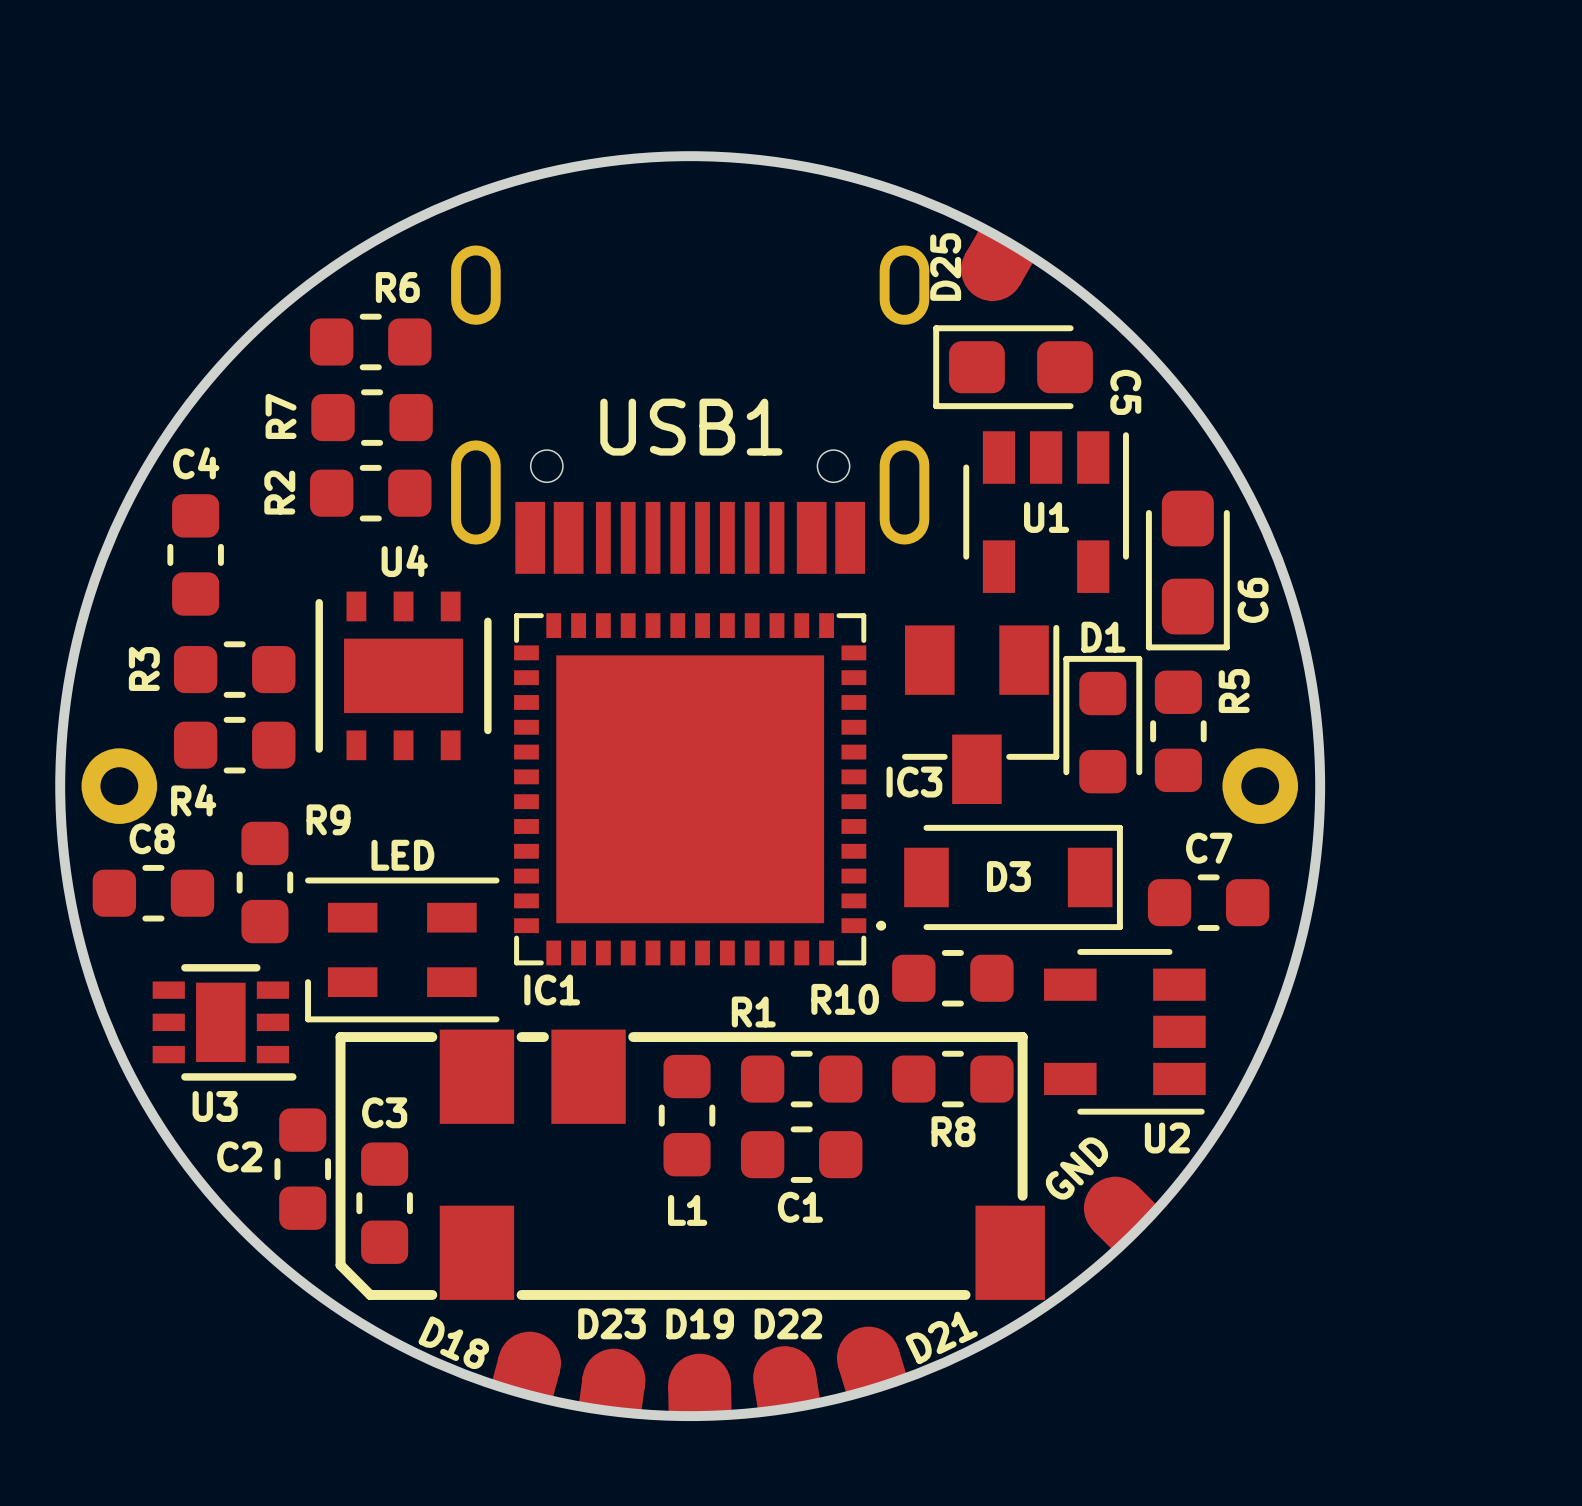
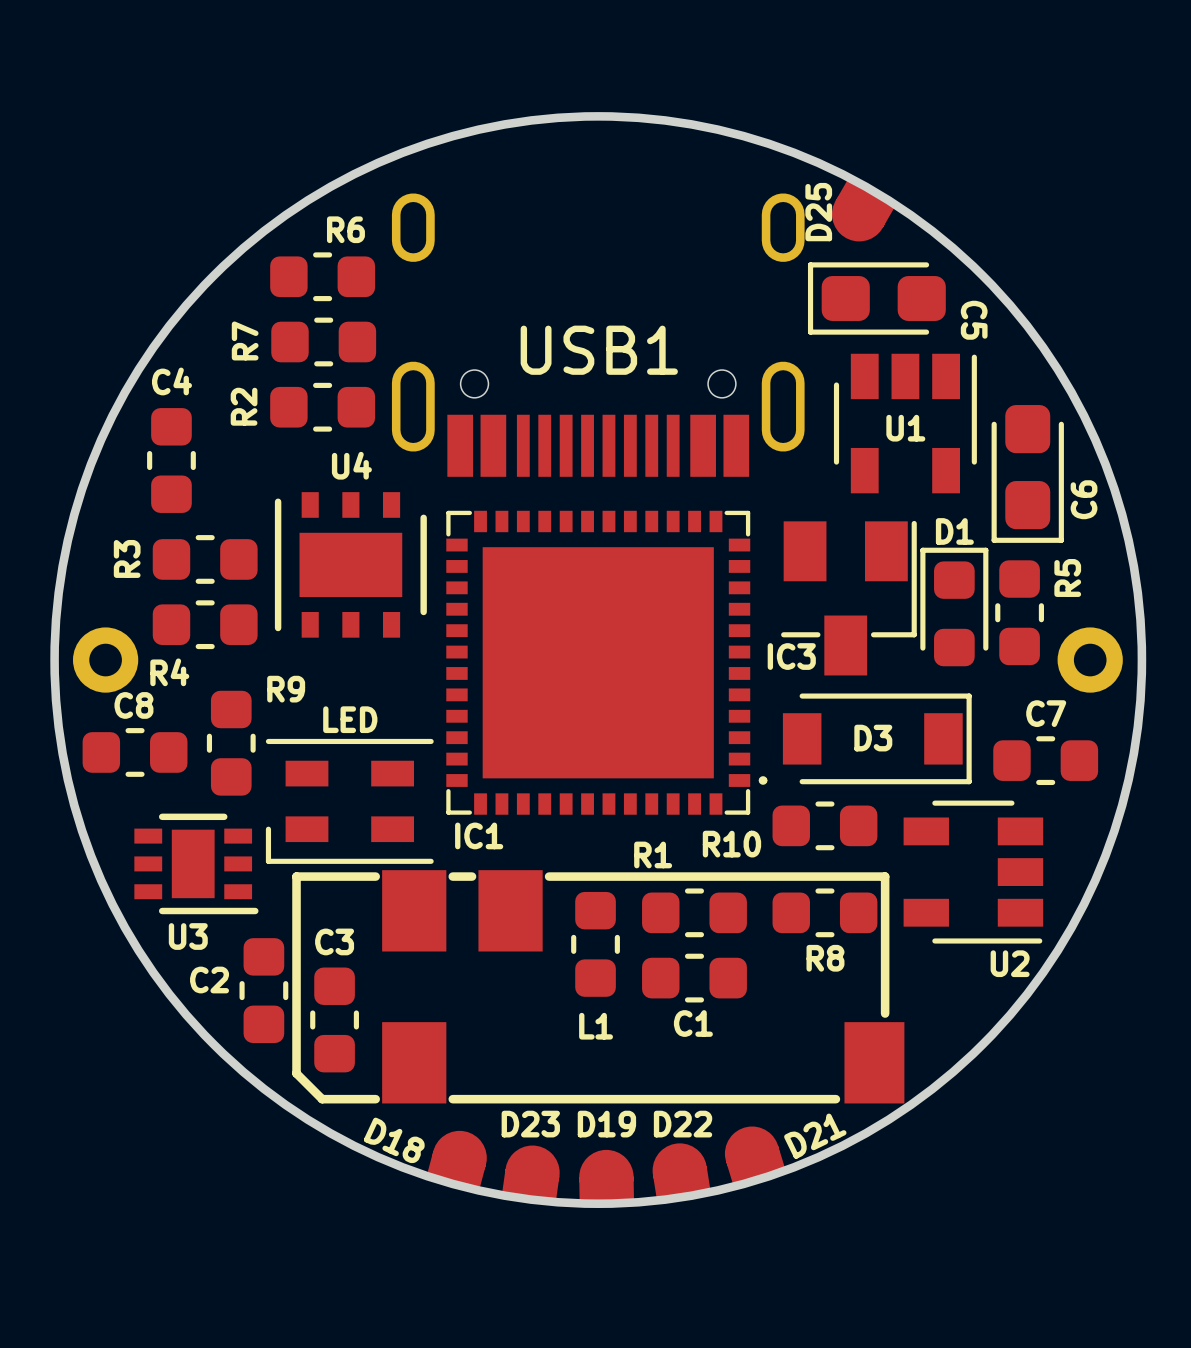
GND: (1121, 1214) -> none

